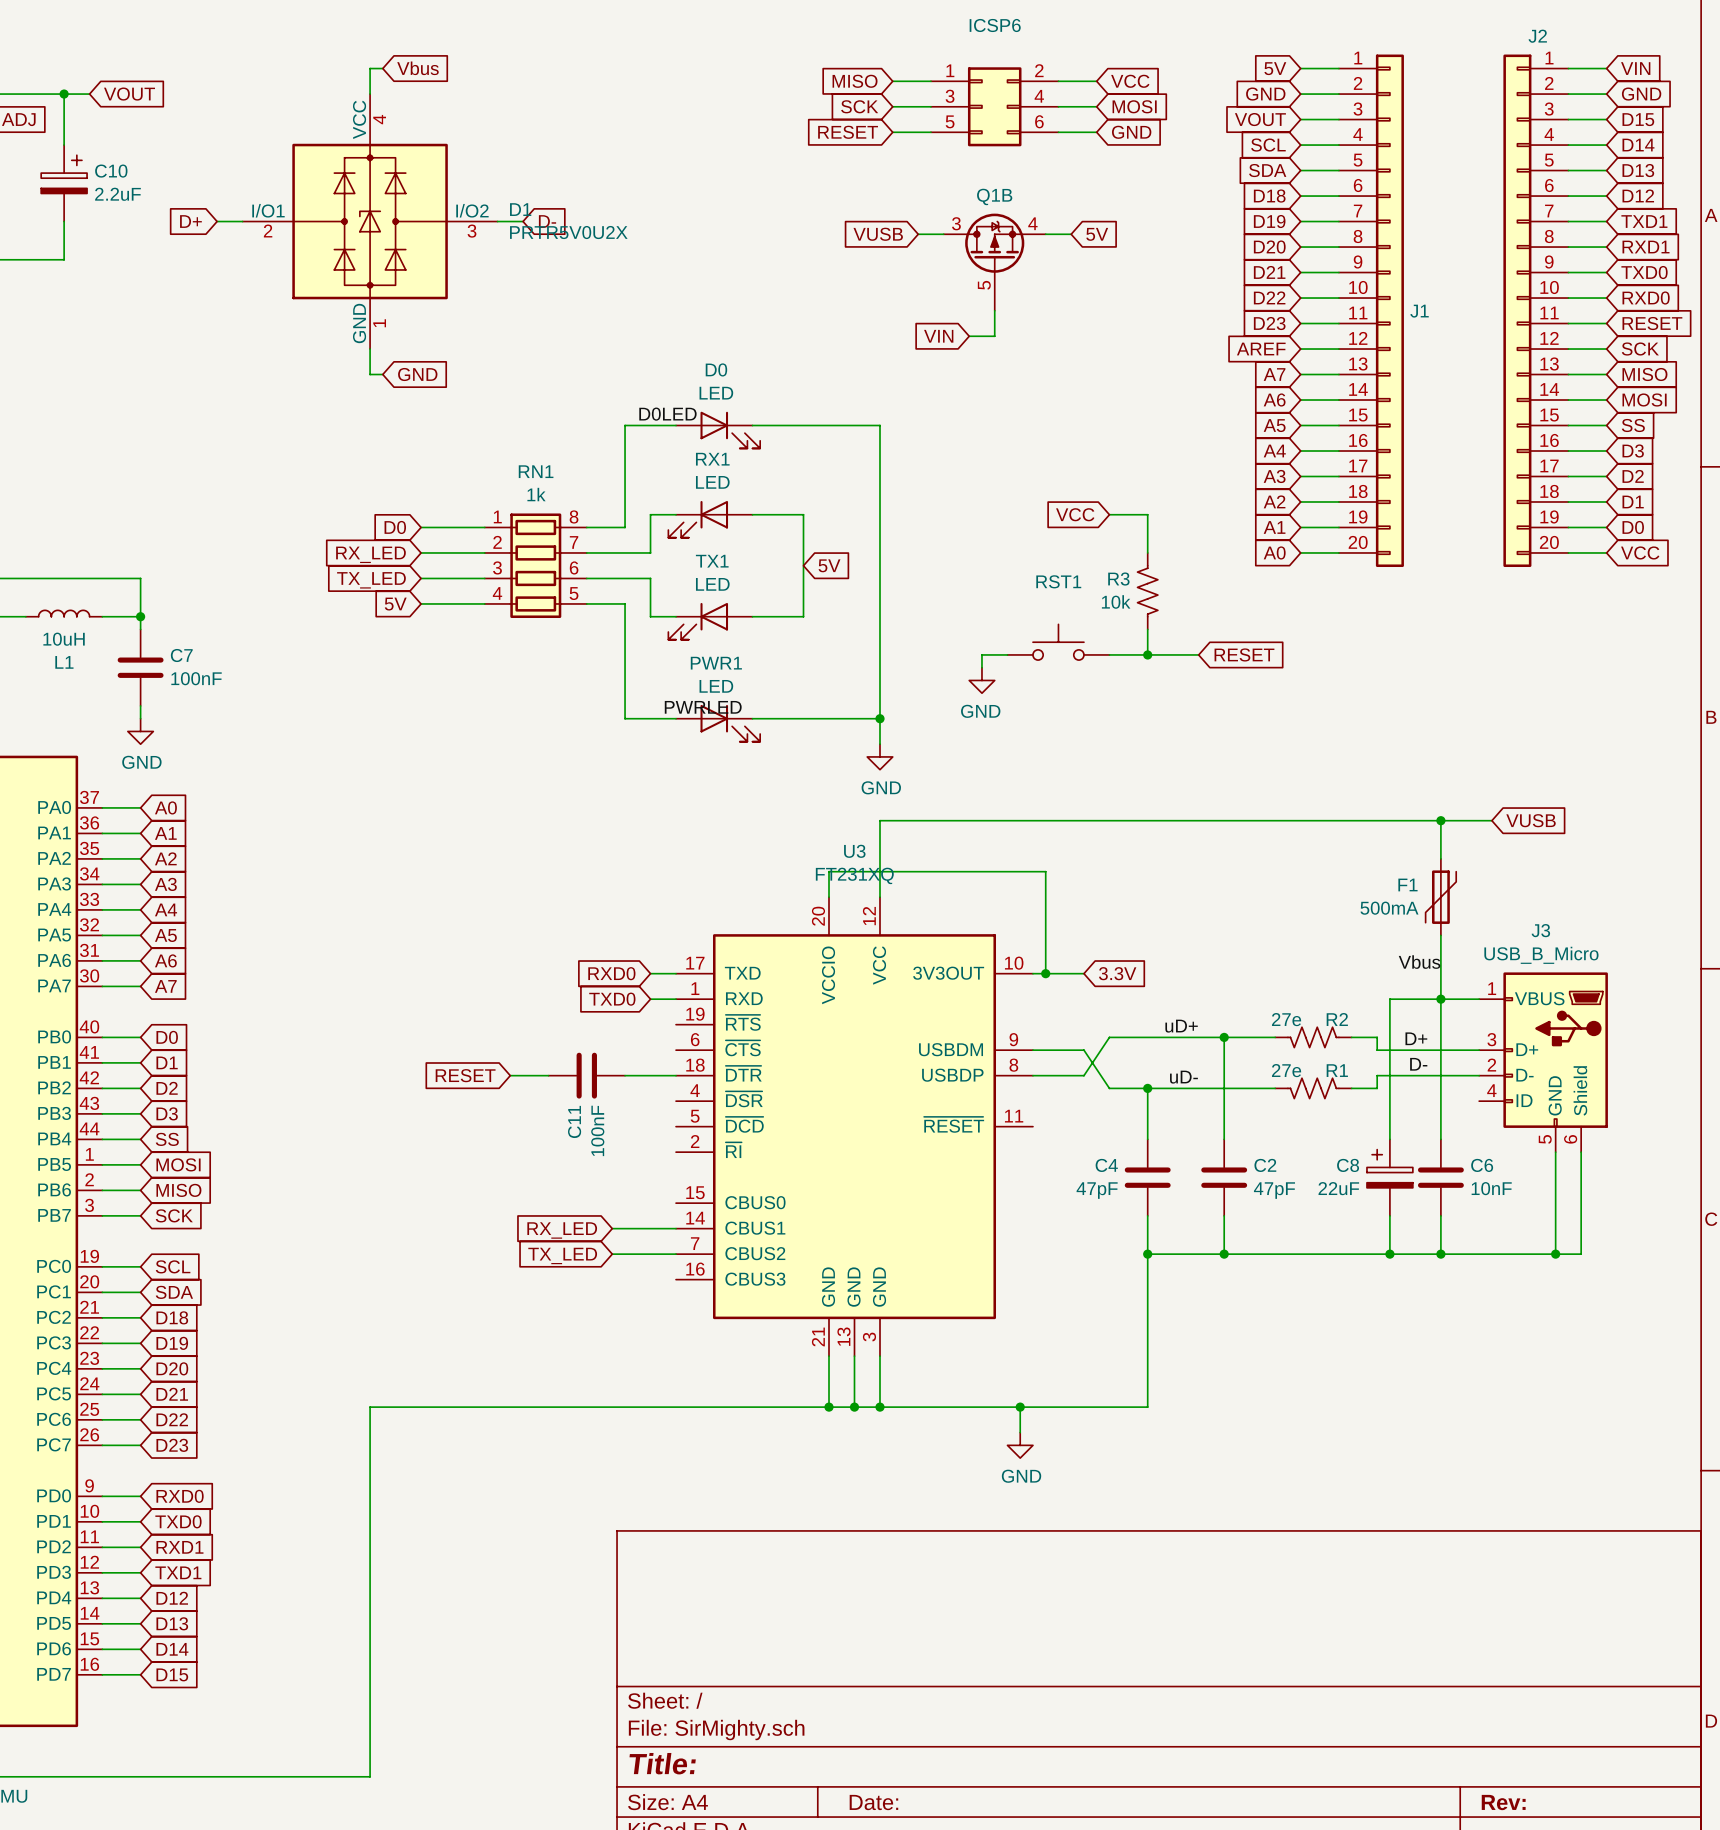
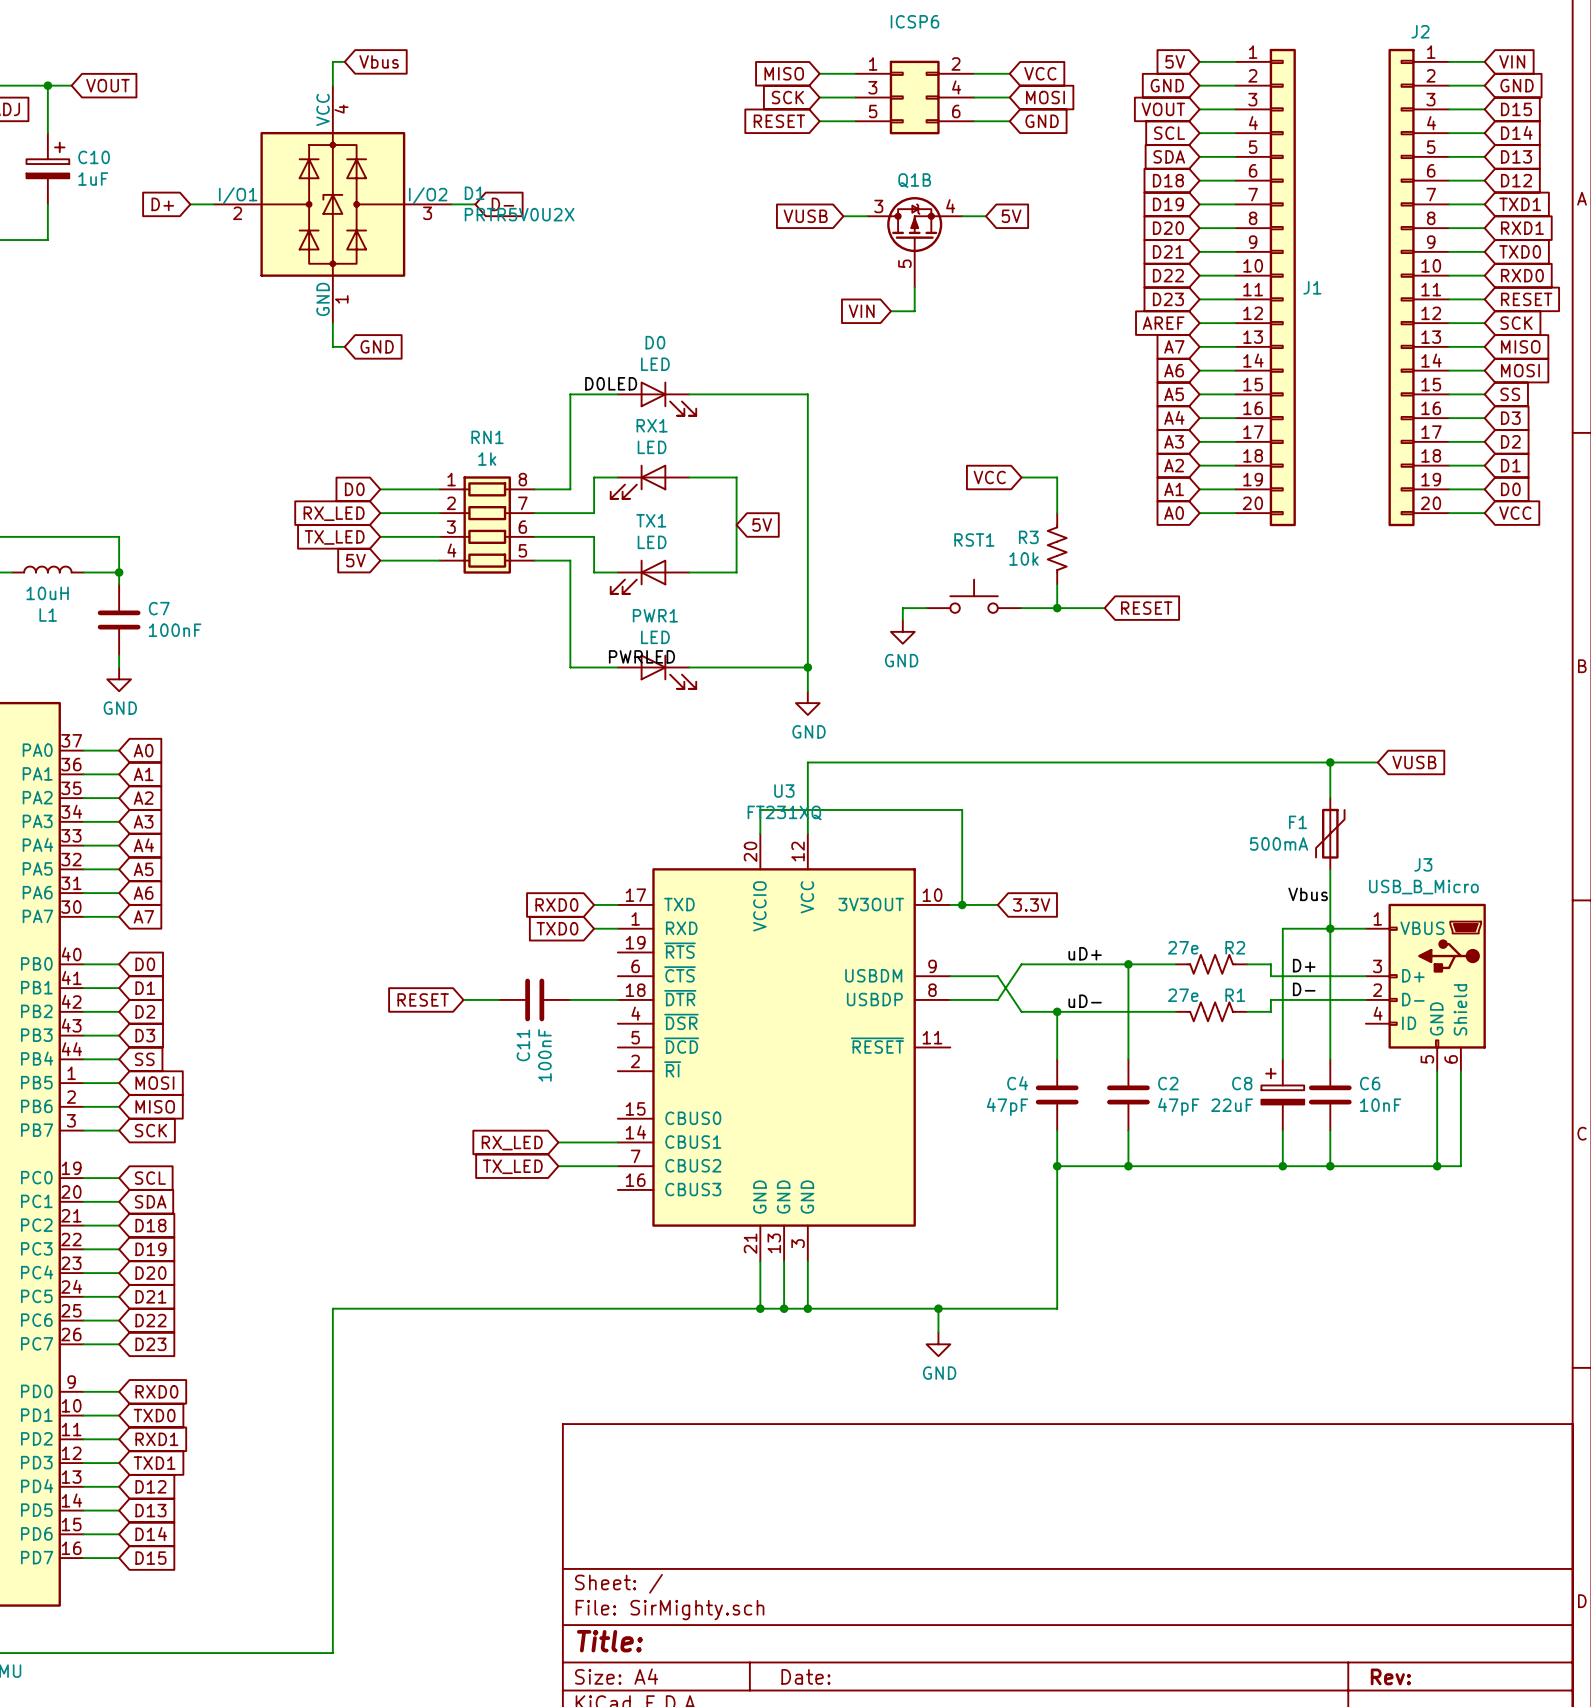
C10 value: 2.2uF (117, 194) -> 1uF (93, 179)

